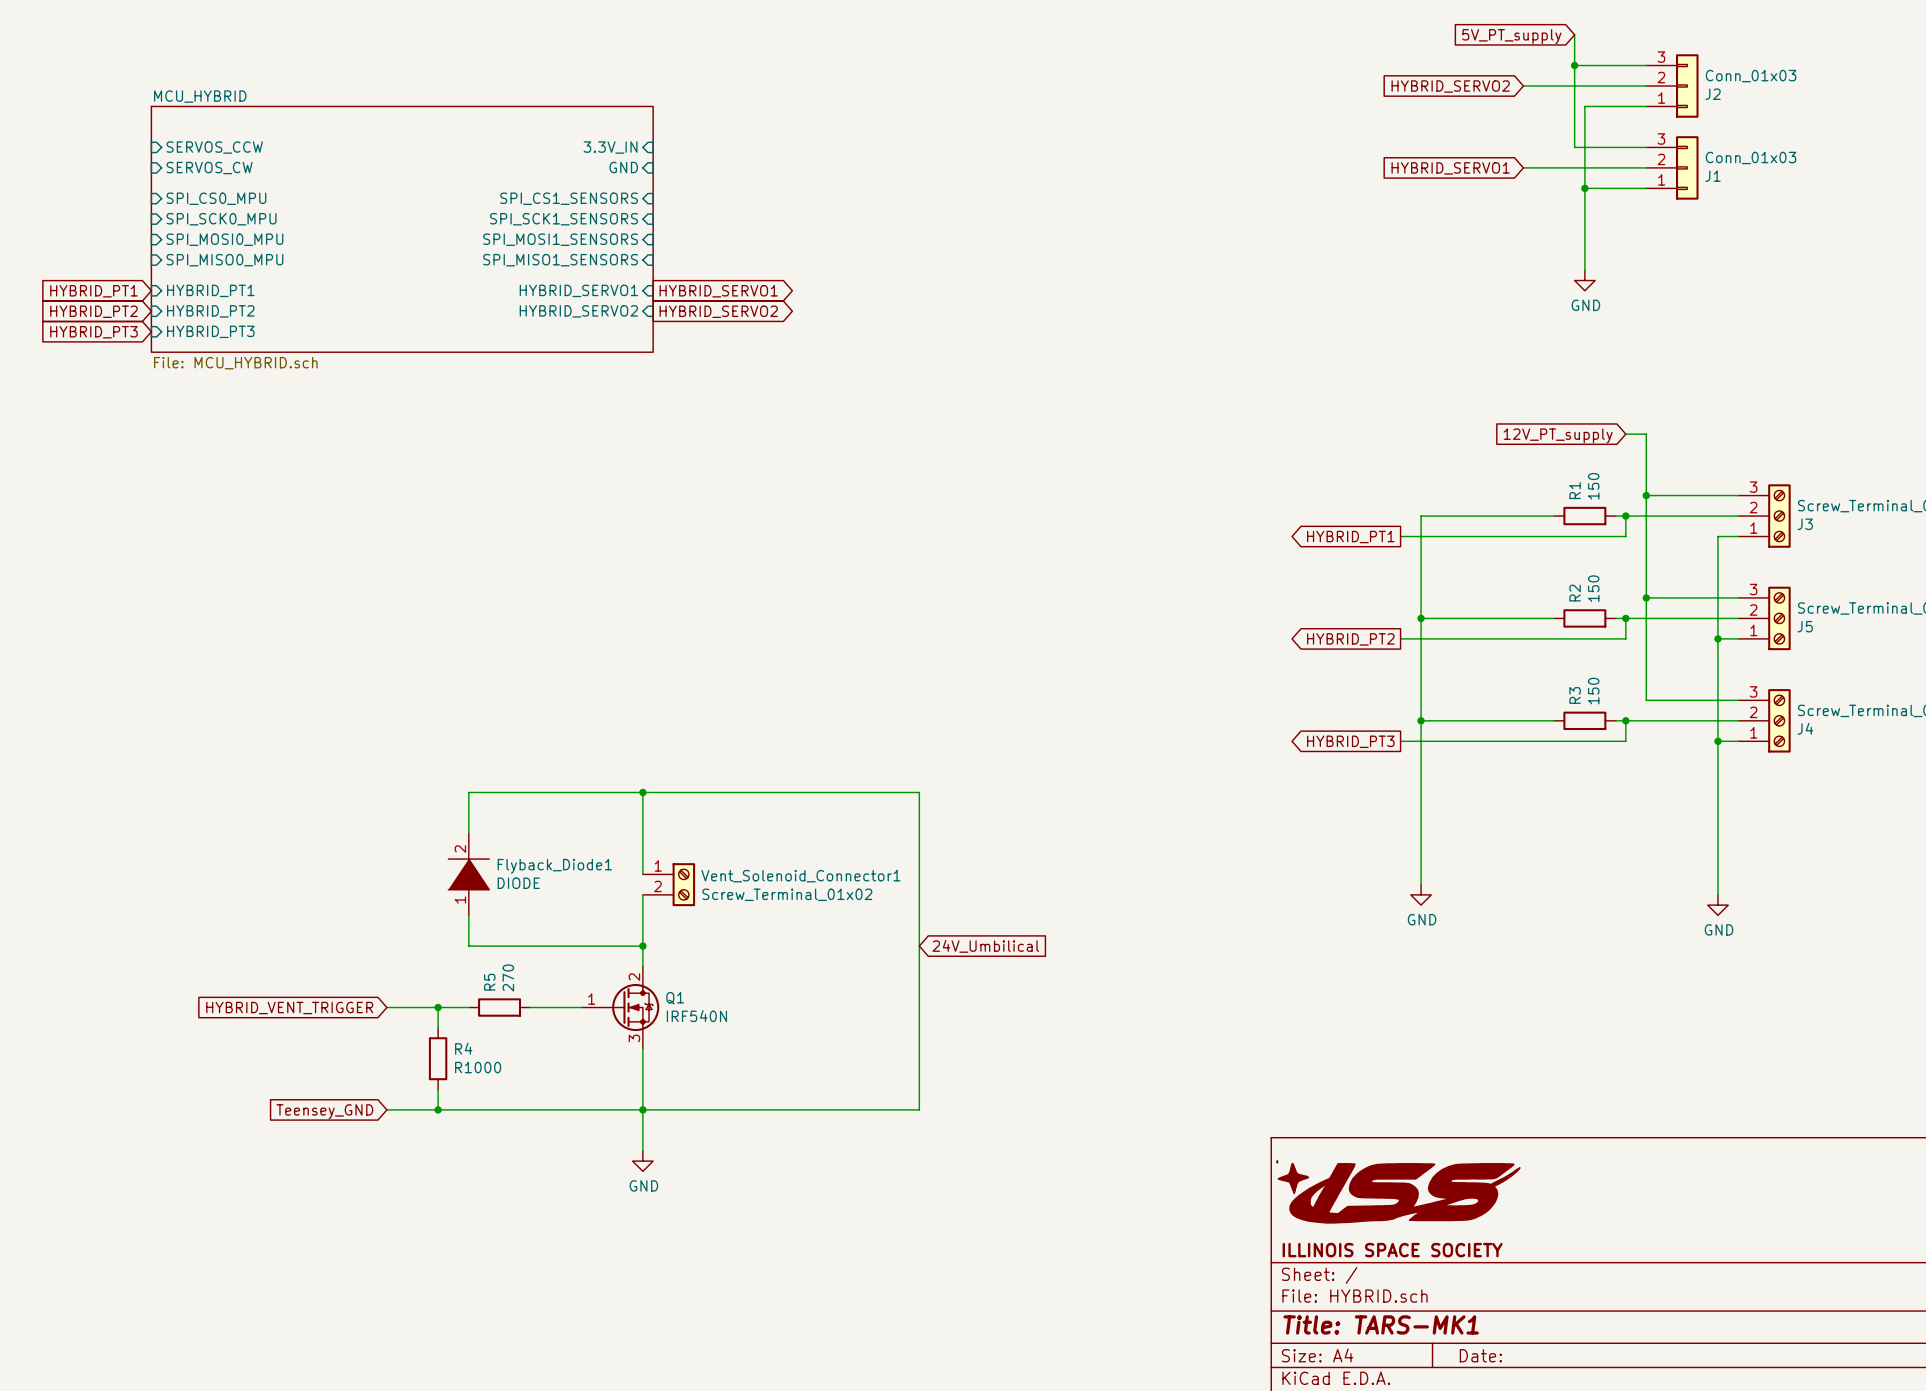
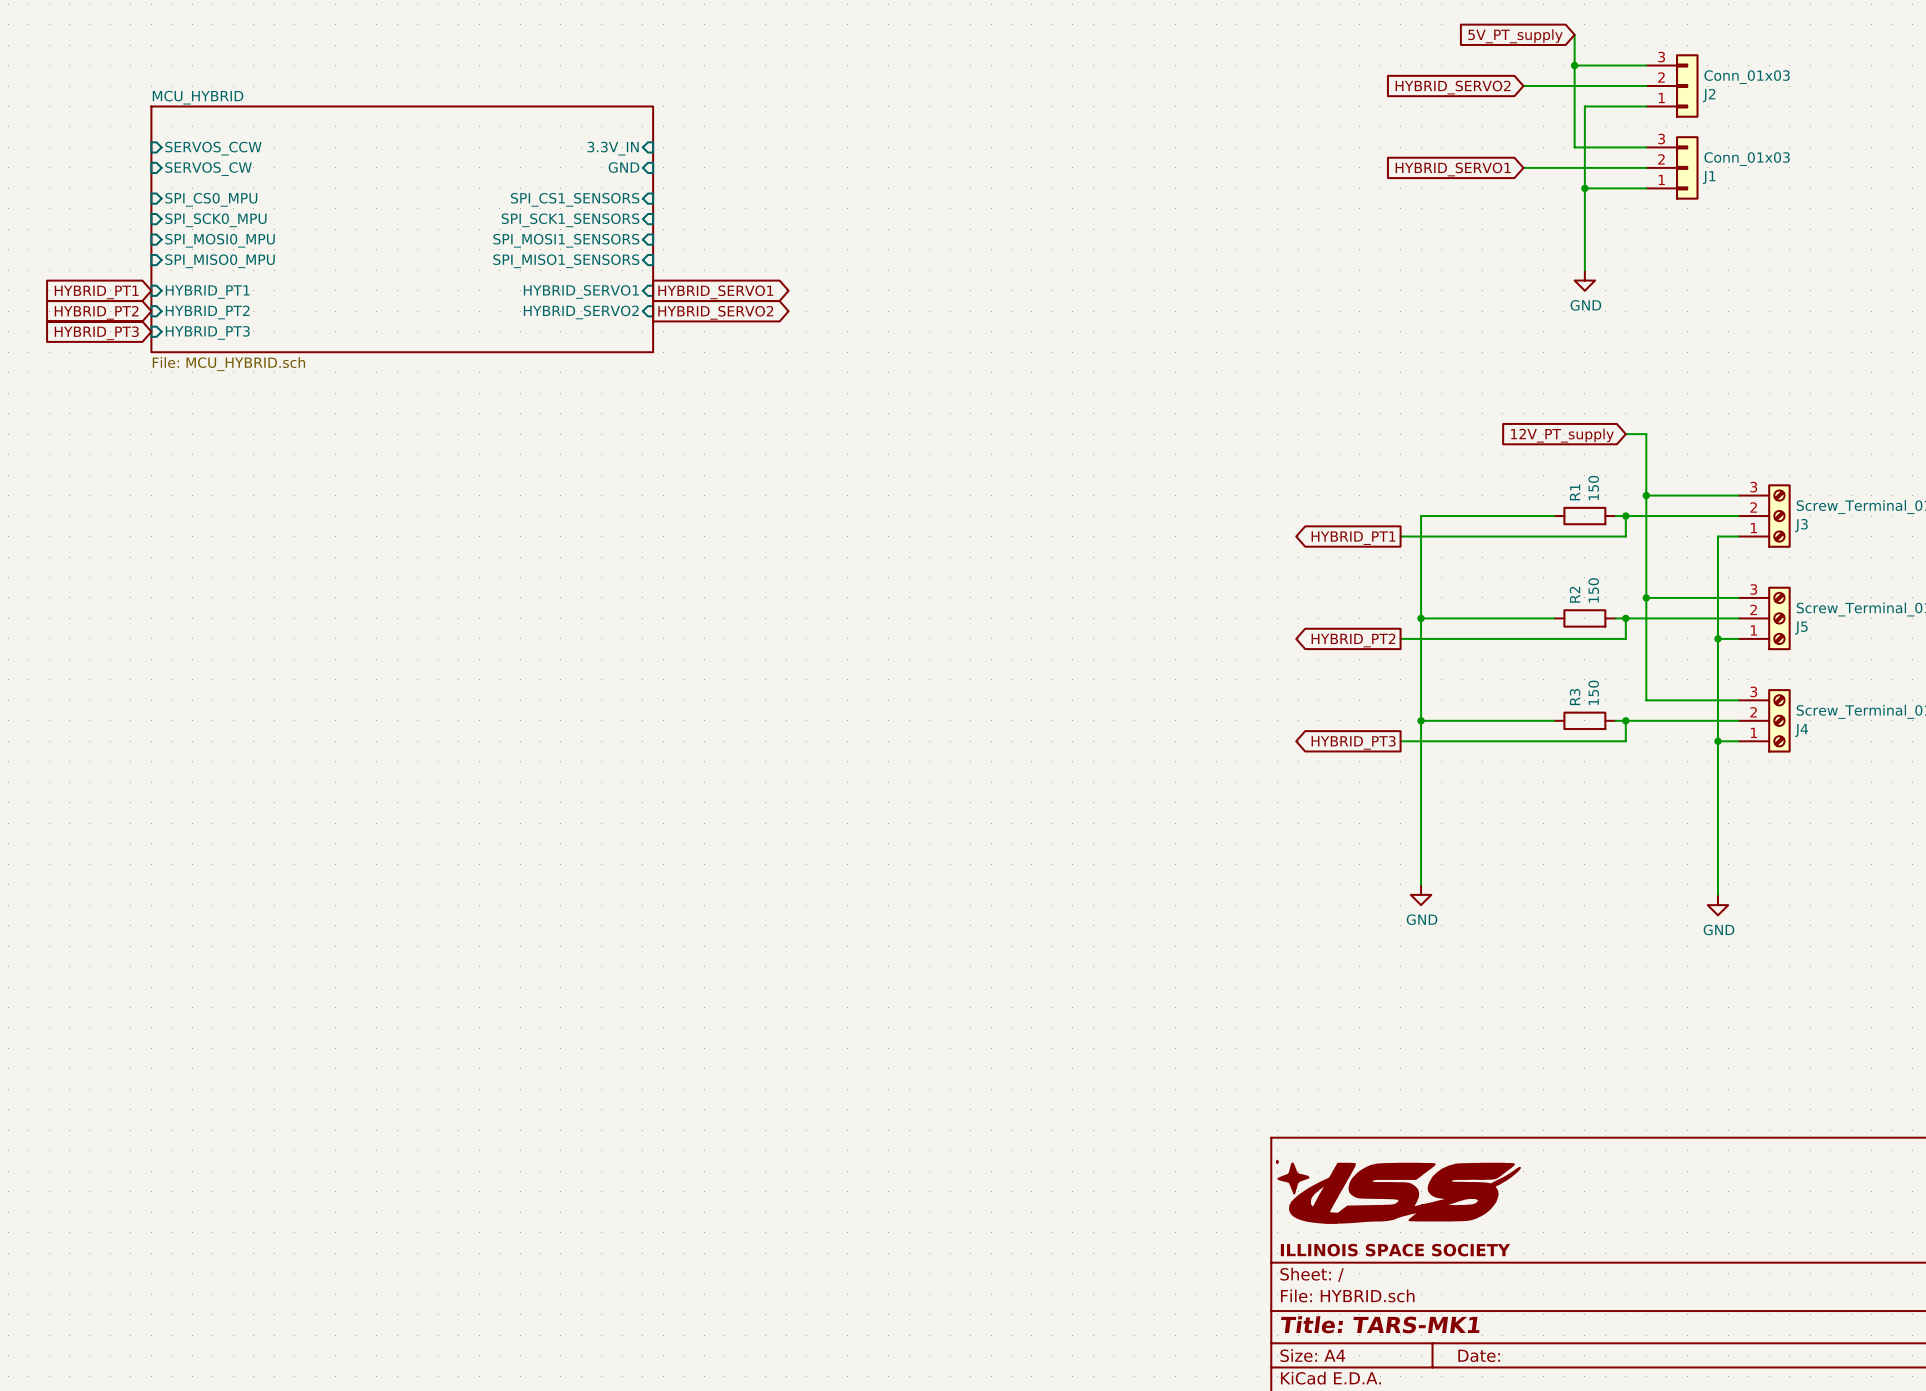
wire: (642, 792) (642, 874) -> none
junction: (642, 792) -> none
wire: (468, 833) (468, 792) (919, 792) (919, 1109) (386, 1109) -> none
Flyback_Diode1: DIODE (468, 874) -> none
Vent_Solenoid_Connector1: Screw_Terminal_01x02 (668, 884) -> none
wire: (642, 894) (642, 966) -> none
wire: (468, 915) (468, 946) (642, 946) -> none
junction: (642, 946) -> none
global label: 24V_Umbilical (985, 946) -> none
wire: (386, 1007) (468, 1007) -> none
wire: (438, 1007) (438, 1027) -> none
junction: (438, 1007) -> none
R5: 270 (499, 1007) -> none
wire: (530, 1007) (581, 1007) -> none
Q1: IRF540N (620, 1007) -> none
global label: HYBRID_VENT_TRIGGER (289, 1008) -> none
wire: (642, 1048) (642, 1150) -> none
R4: R1000 (438, 1058) -> none
wire: (438, 1089) (438, 1109) -> none
junction: (438, 1109) -> none
junction: (642, 1109) -> none
global label: Teensey_GND (324, 1111) -> none
power symbol: GND (642, 1161) -> none

